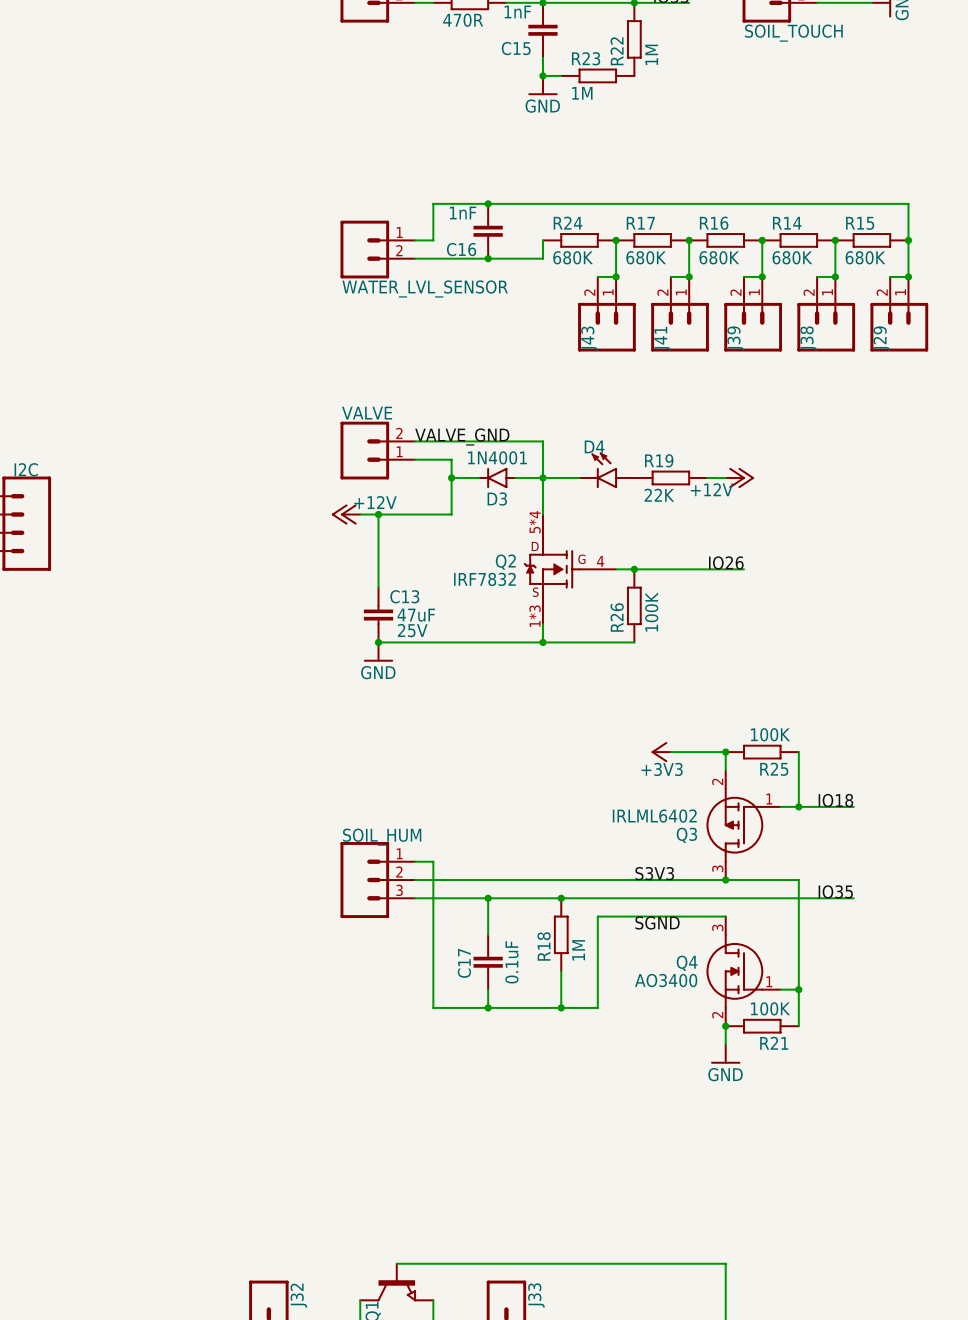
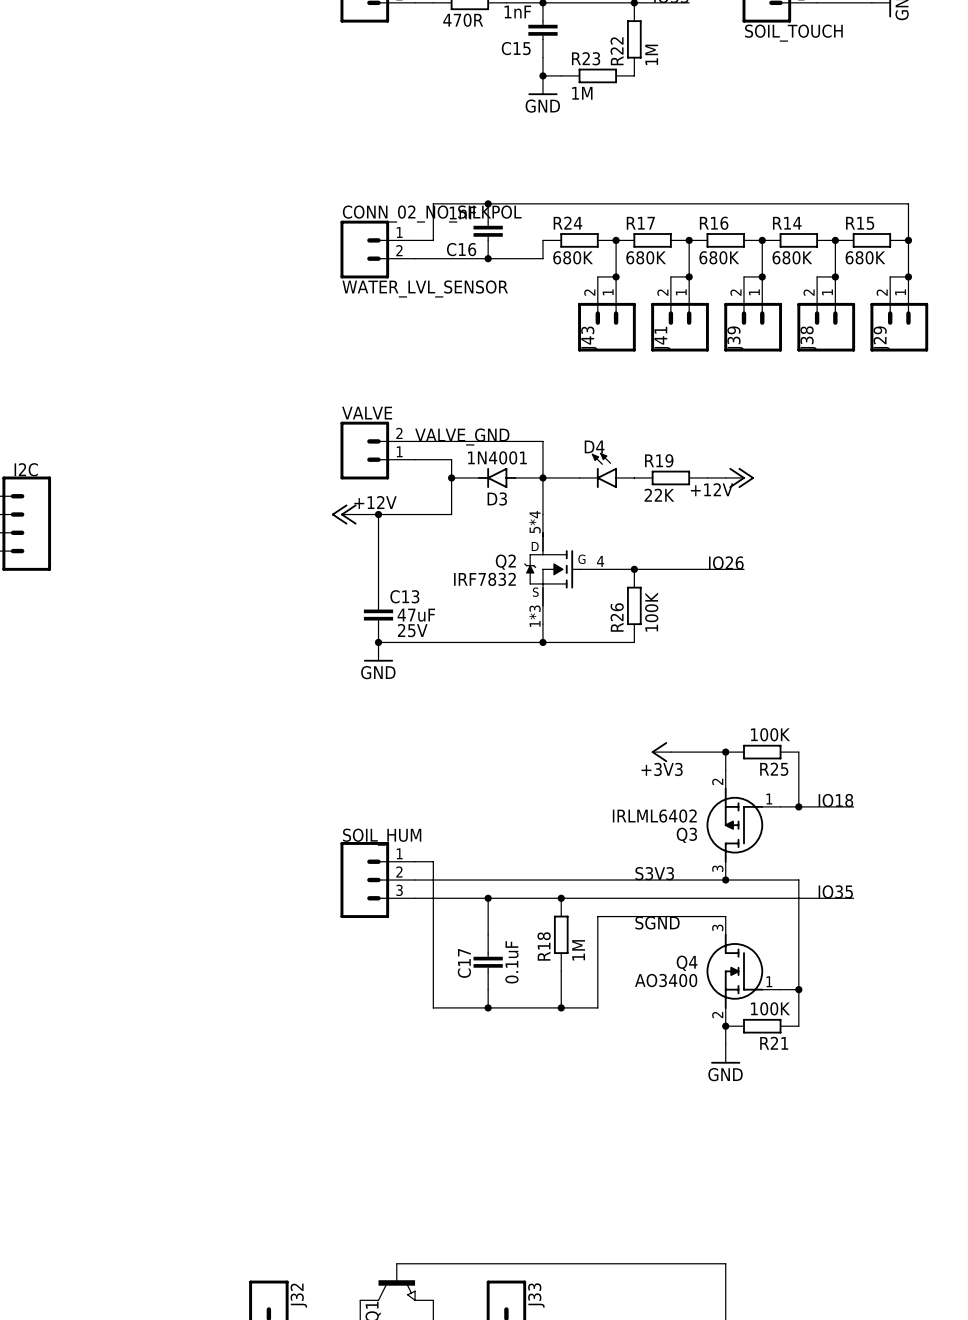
WATER_LVL_SENSOR value: none -> CONN_02_NO_SILKPOL (432, 214)

